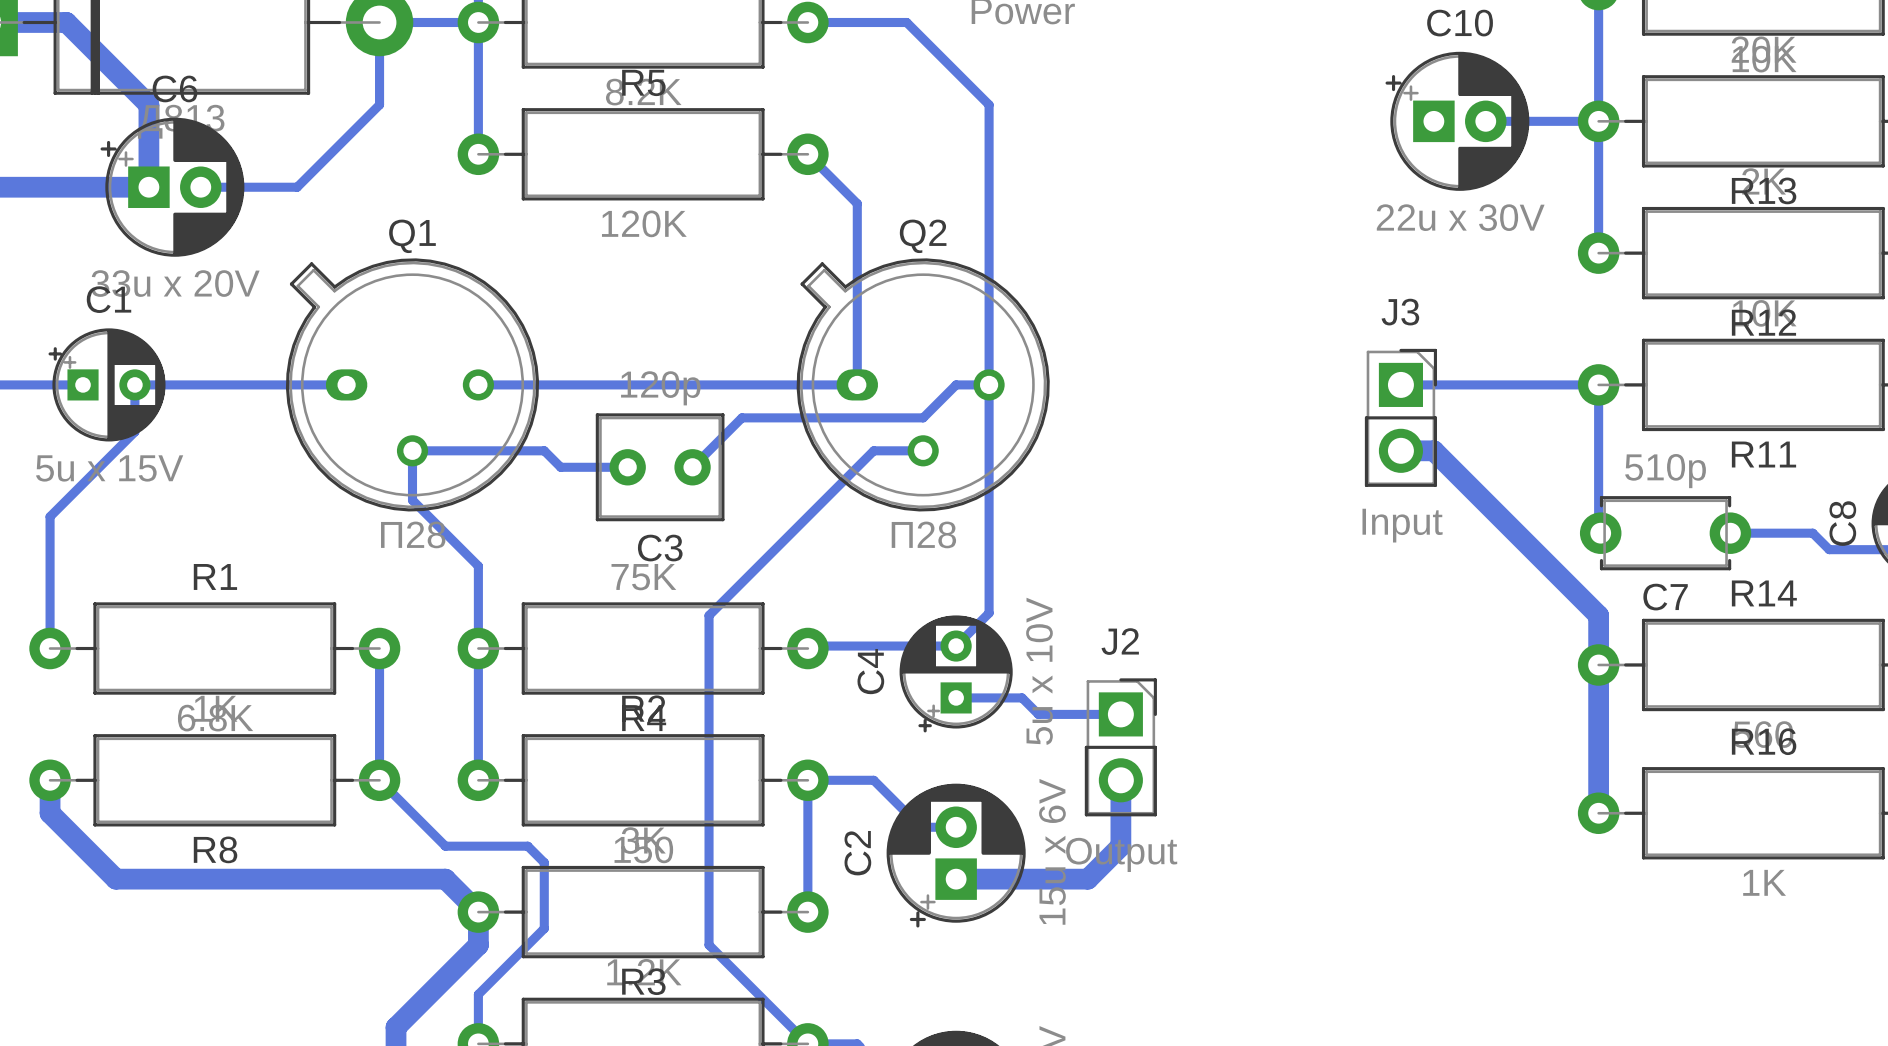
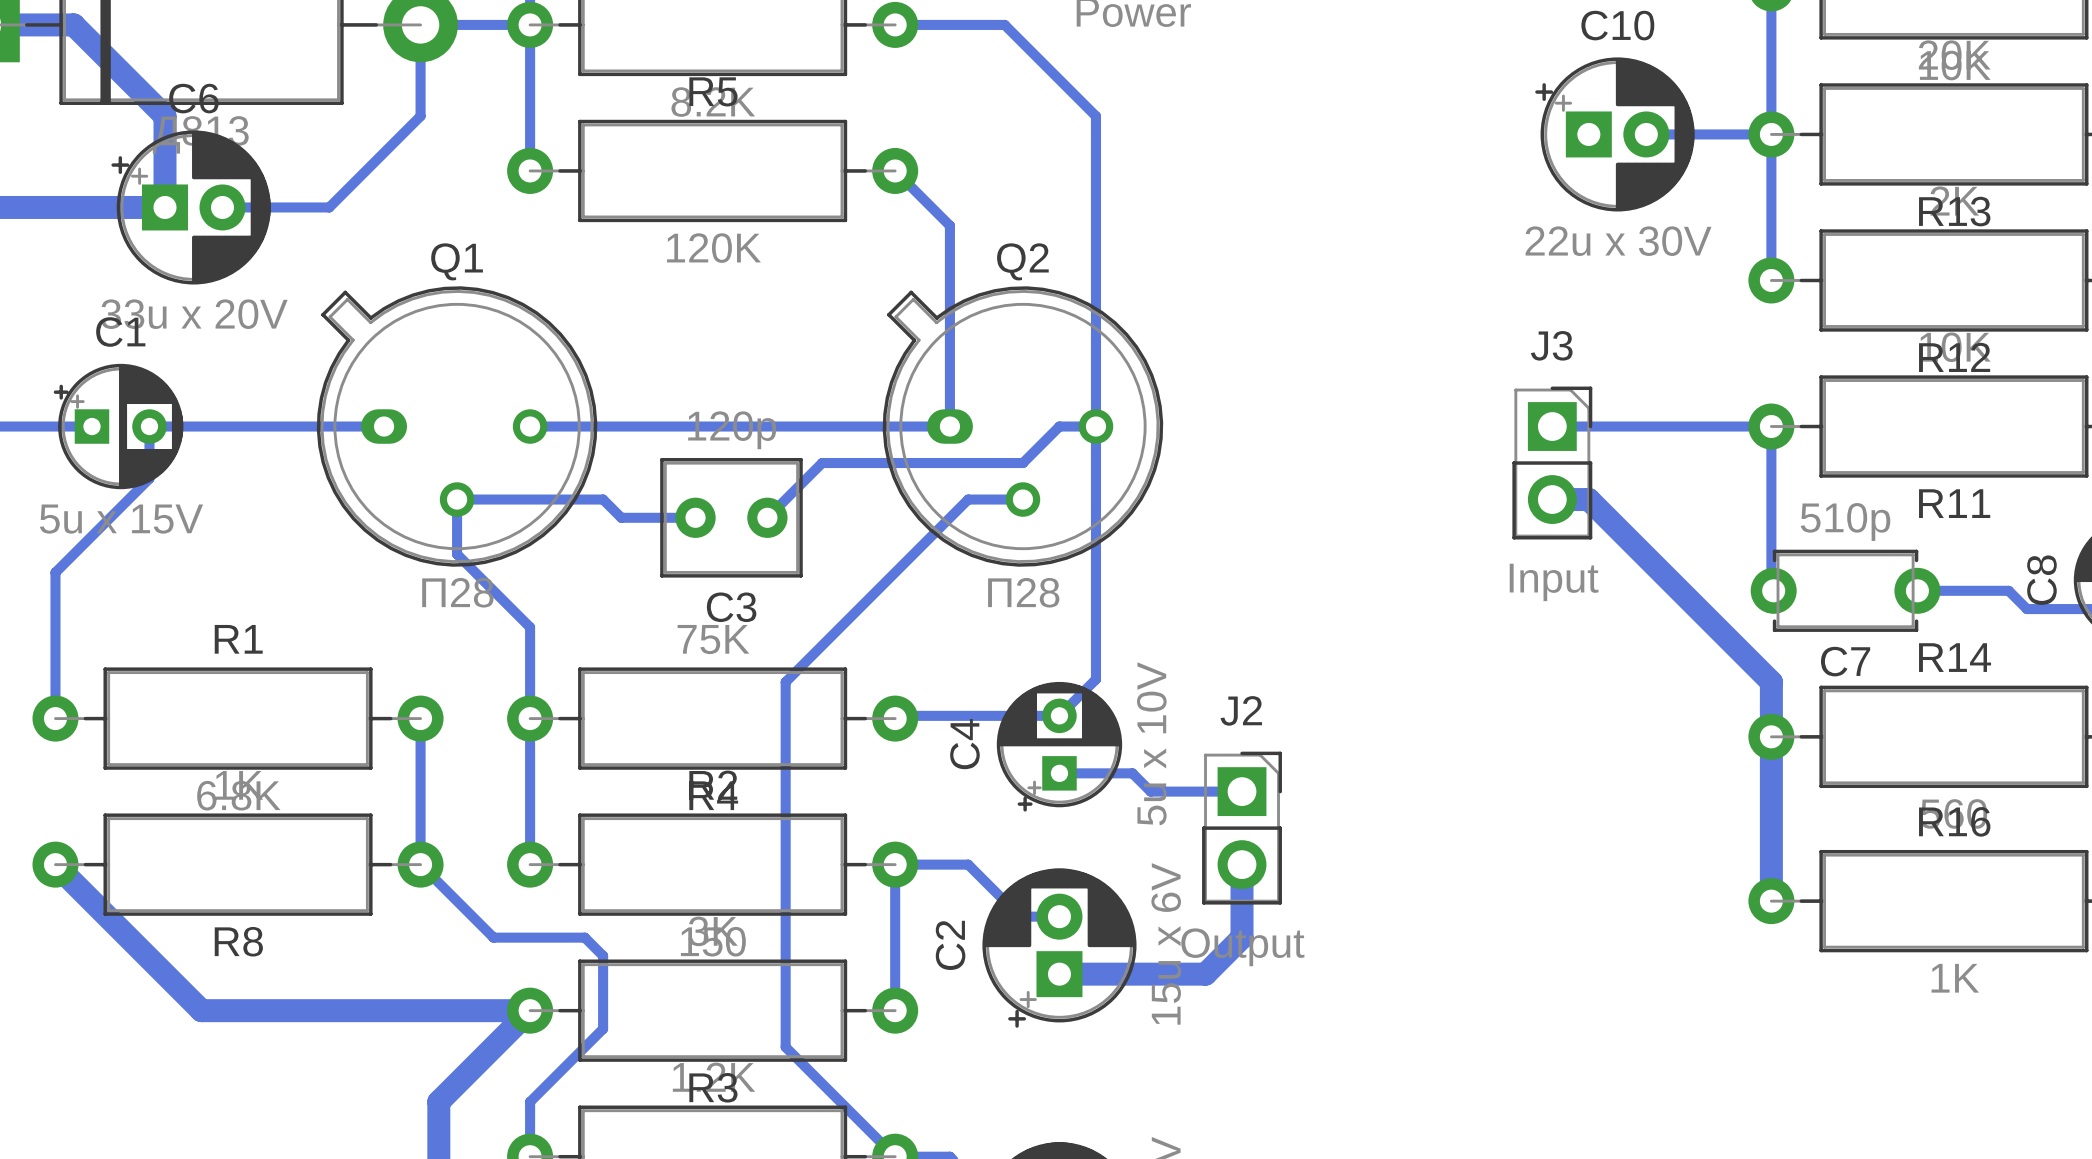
bottom track: (50, 780) (50, 813) (115, 879) (445, 879) (478, 912) (478, 945) (396, 1027) -> (55, 864) (201, 1010) (530, 1010) (438, 1101) (438, 1138)

